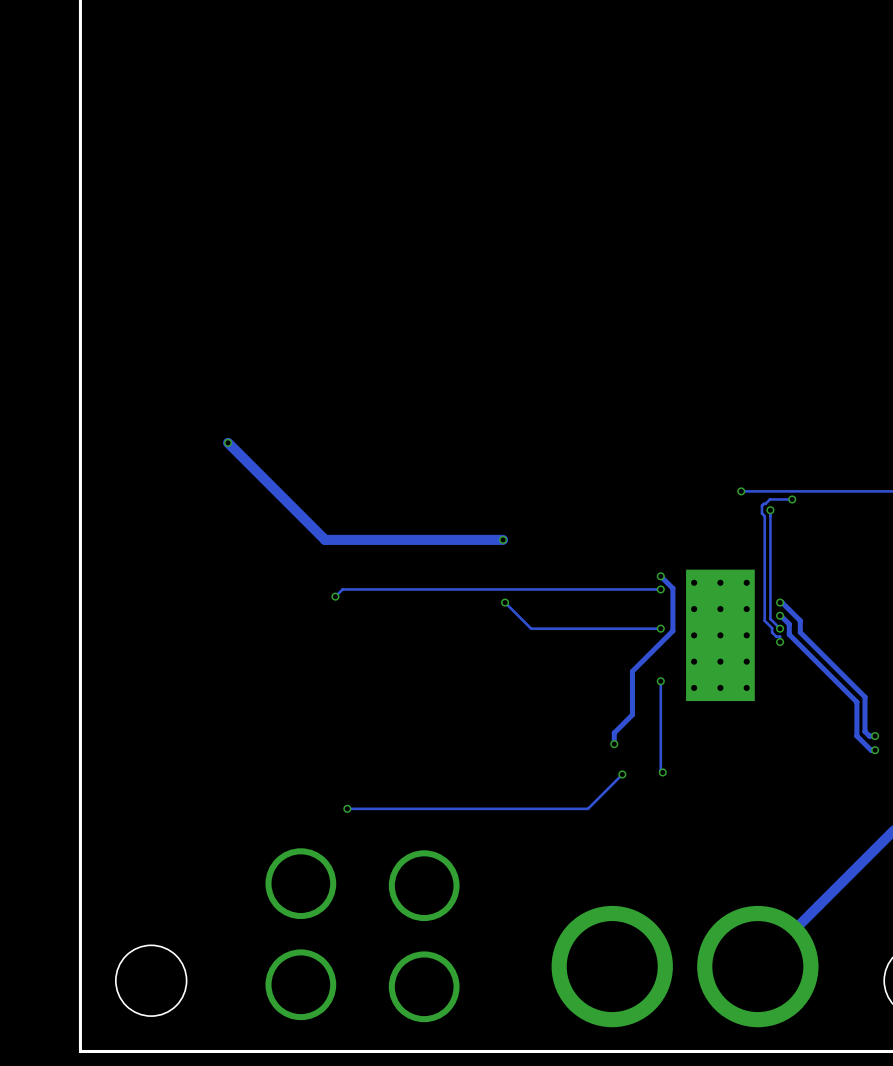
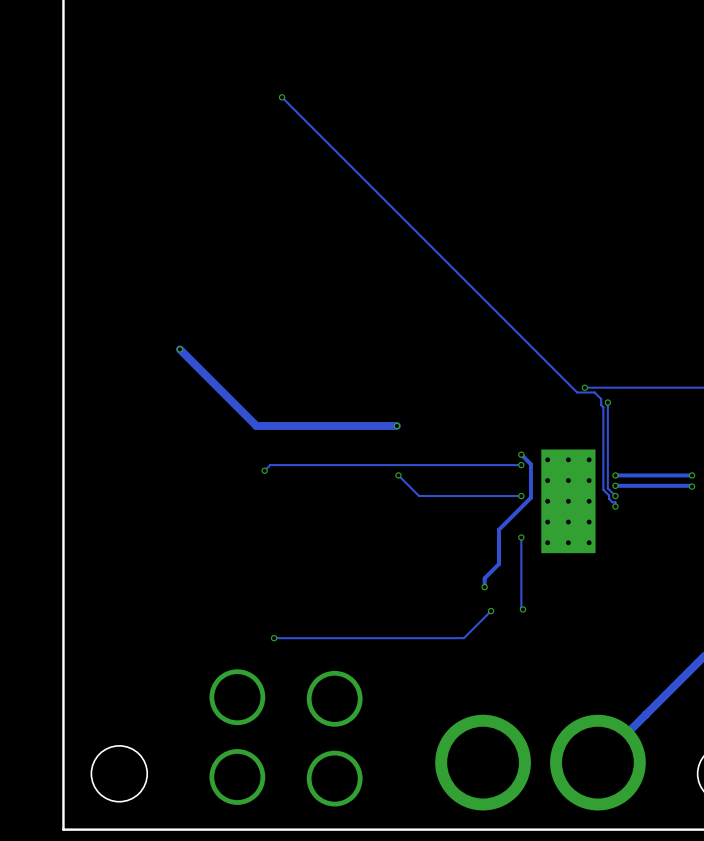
via: none -> (282, 97)
track: (792, 499) (769, 499) (761, 505) -> (282, 97) (577, 392) (594, 392) (601, 399)
via: (792, 499) -> none
track: (782, 602) (800, 620) (800, 632) (865, 697) (865, 731) (869, 736) (875, 736) -> (617, 475) (692, 475)
via: none -> (692, 475)
track: (780, 615) (789, 624) (789, 634) (856, 702) (856, 736) (871, 750) (875, 750) -> (616, 485) (692, 486)
via: none -> (692, 486)
via: (875, 736) -> none
via: (875, 750) -> none

